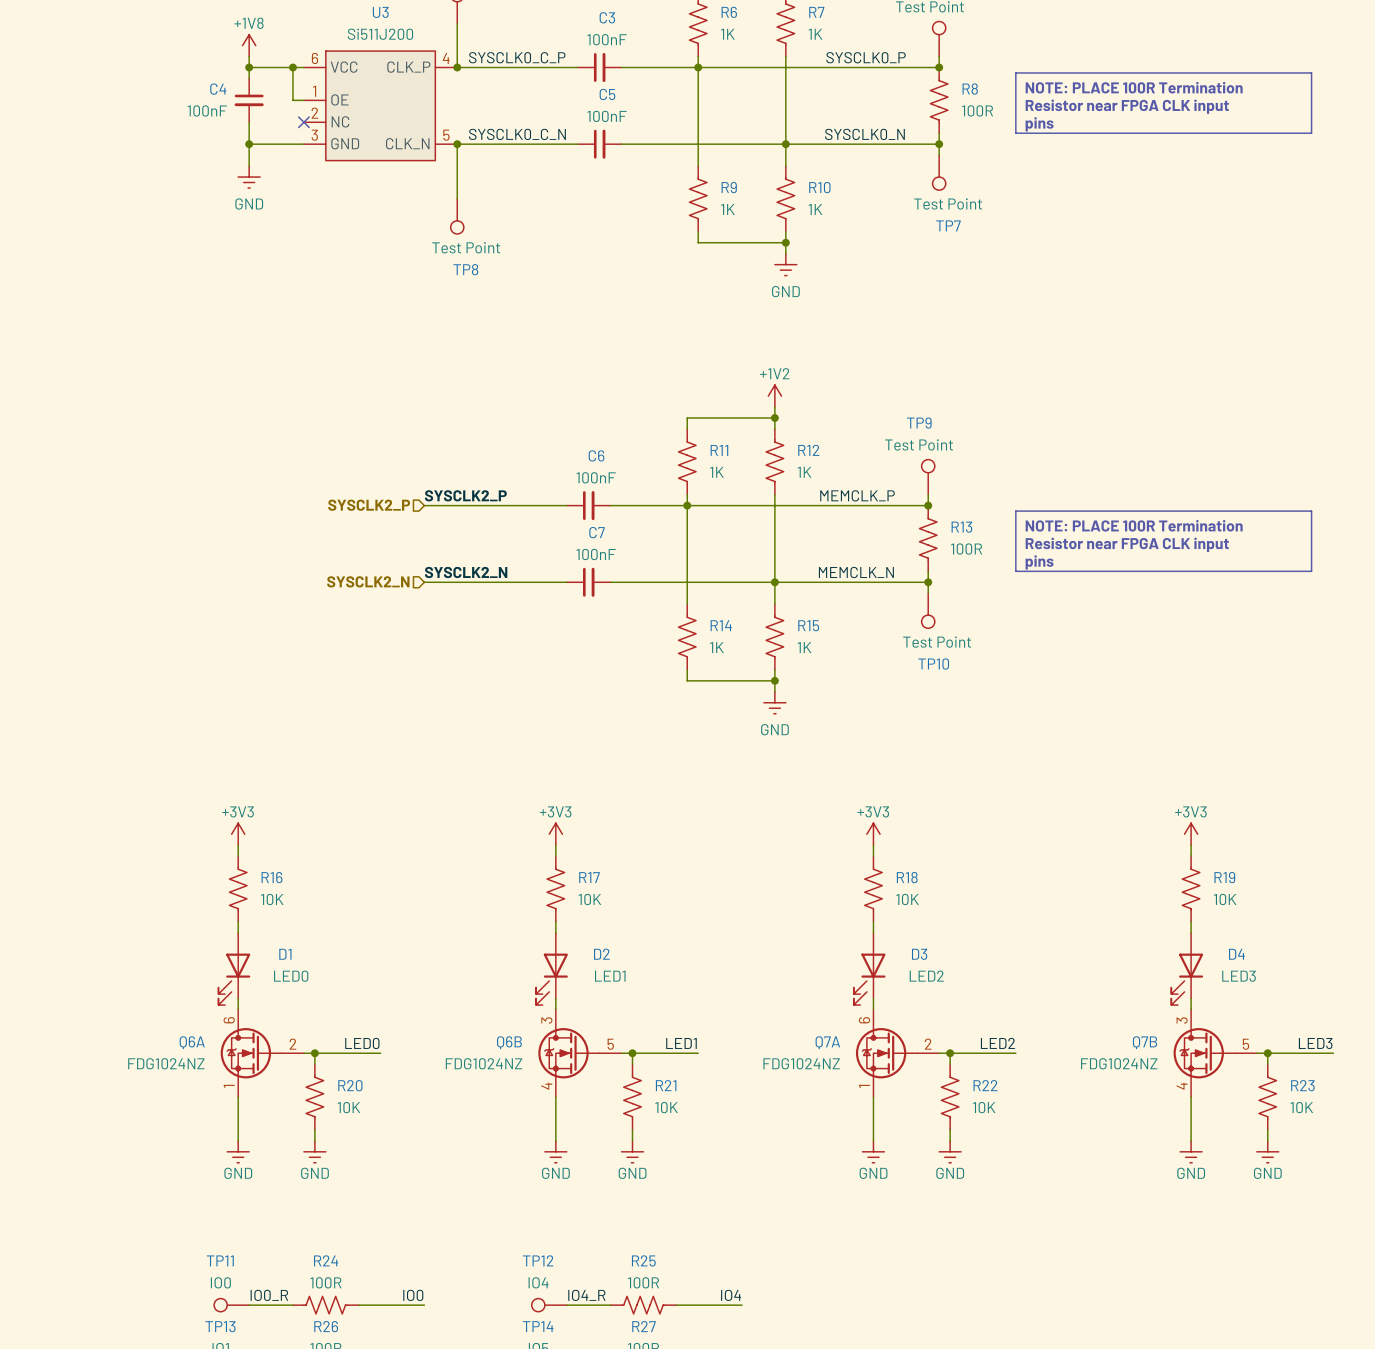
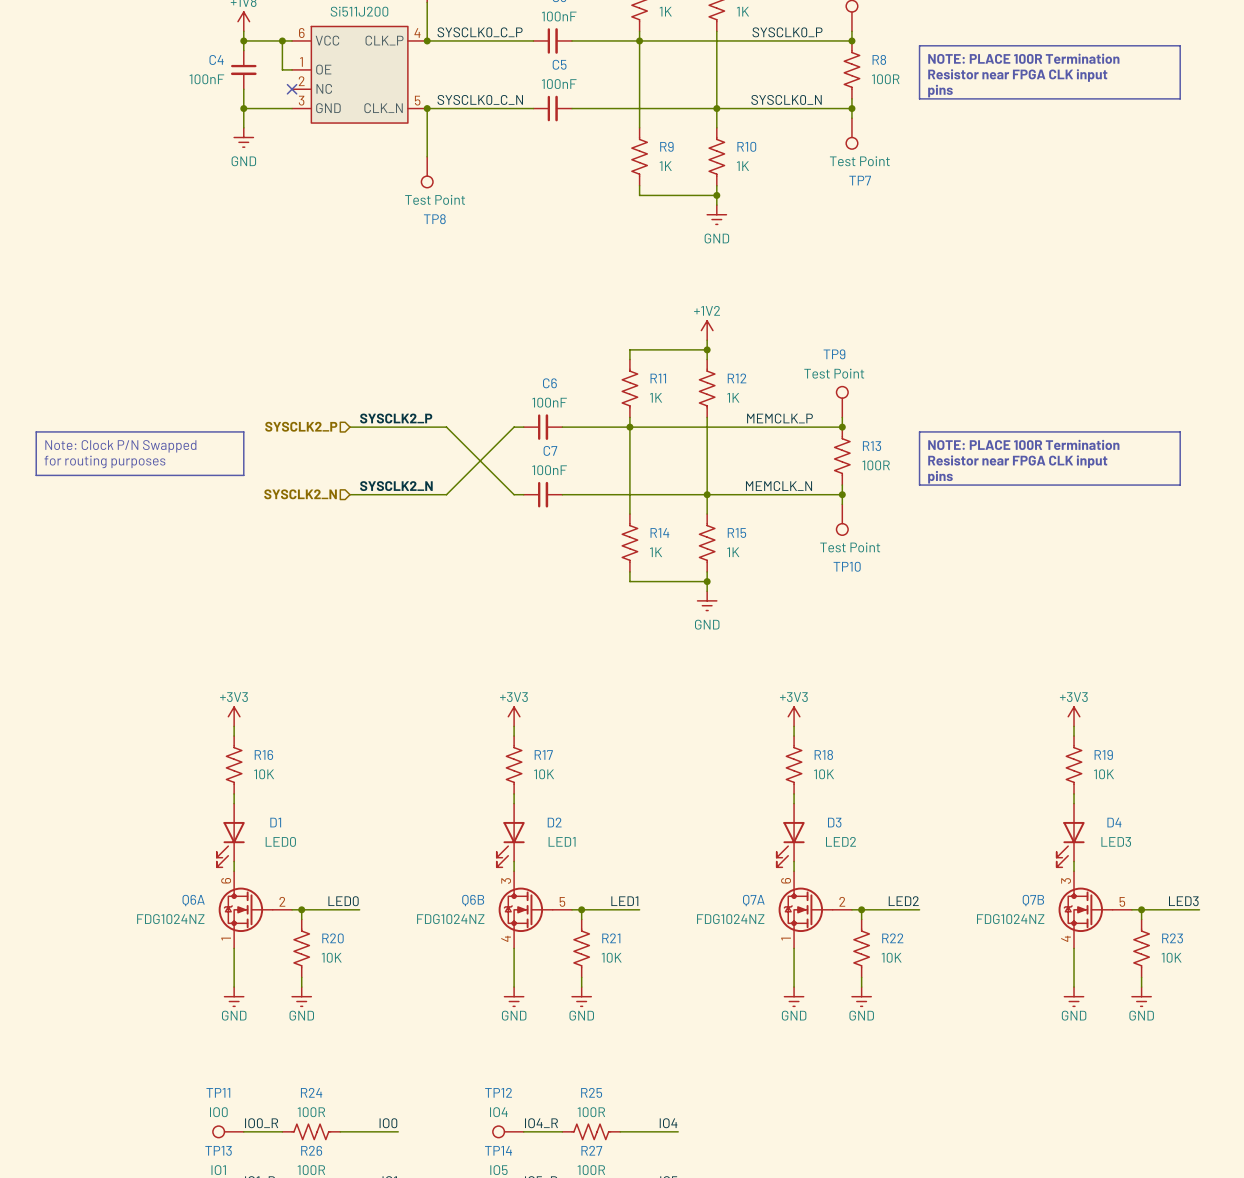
label position: SYSCLK2_P (465, 495) -> SYSCLK2_P (396, 418)
wire: none -> (349, 427) (398, 427)
hierarchical label position: SYSCLK2_P (369, 505) -> SYSCLK2_P (301, 426)
wire: (479, 505) (555, 505) -> (446, 427) (514, 494)
line: none -> (36, 431) (243, 431) (243, 475) (36, 475) (36, 431)
text: none -> Note: Clock P/N Swapped (120, 446)
text: none -> for routing purposes (104, 461)
label position: SYSCLK2_N (466, 572) -> SYSCLK2_N (396, 486)
hierarchical label position: SYSCLK2_N (368, 581) -> SYSCLK2_N (300, 494)
wire: none -> (349, 494) (398, 494)
wire: (479, 582) (555, 582) -> (446, 494) (514, 427)

